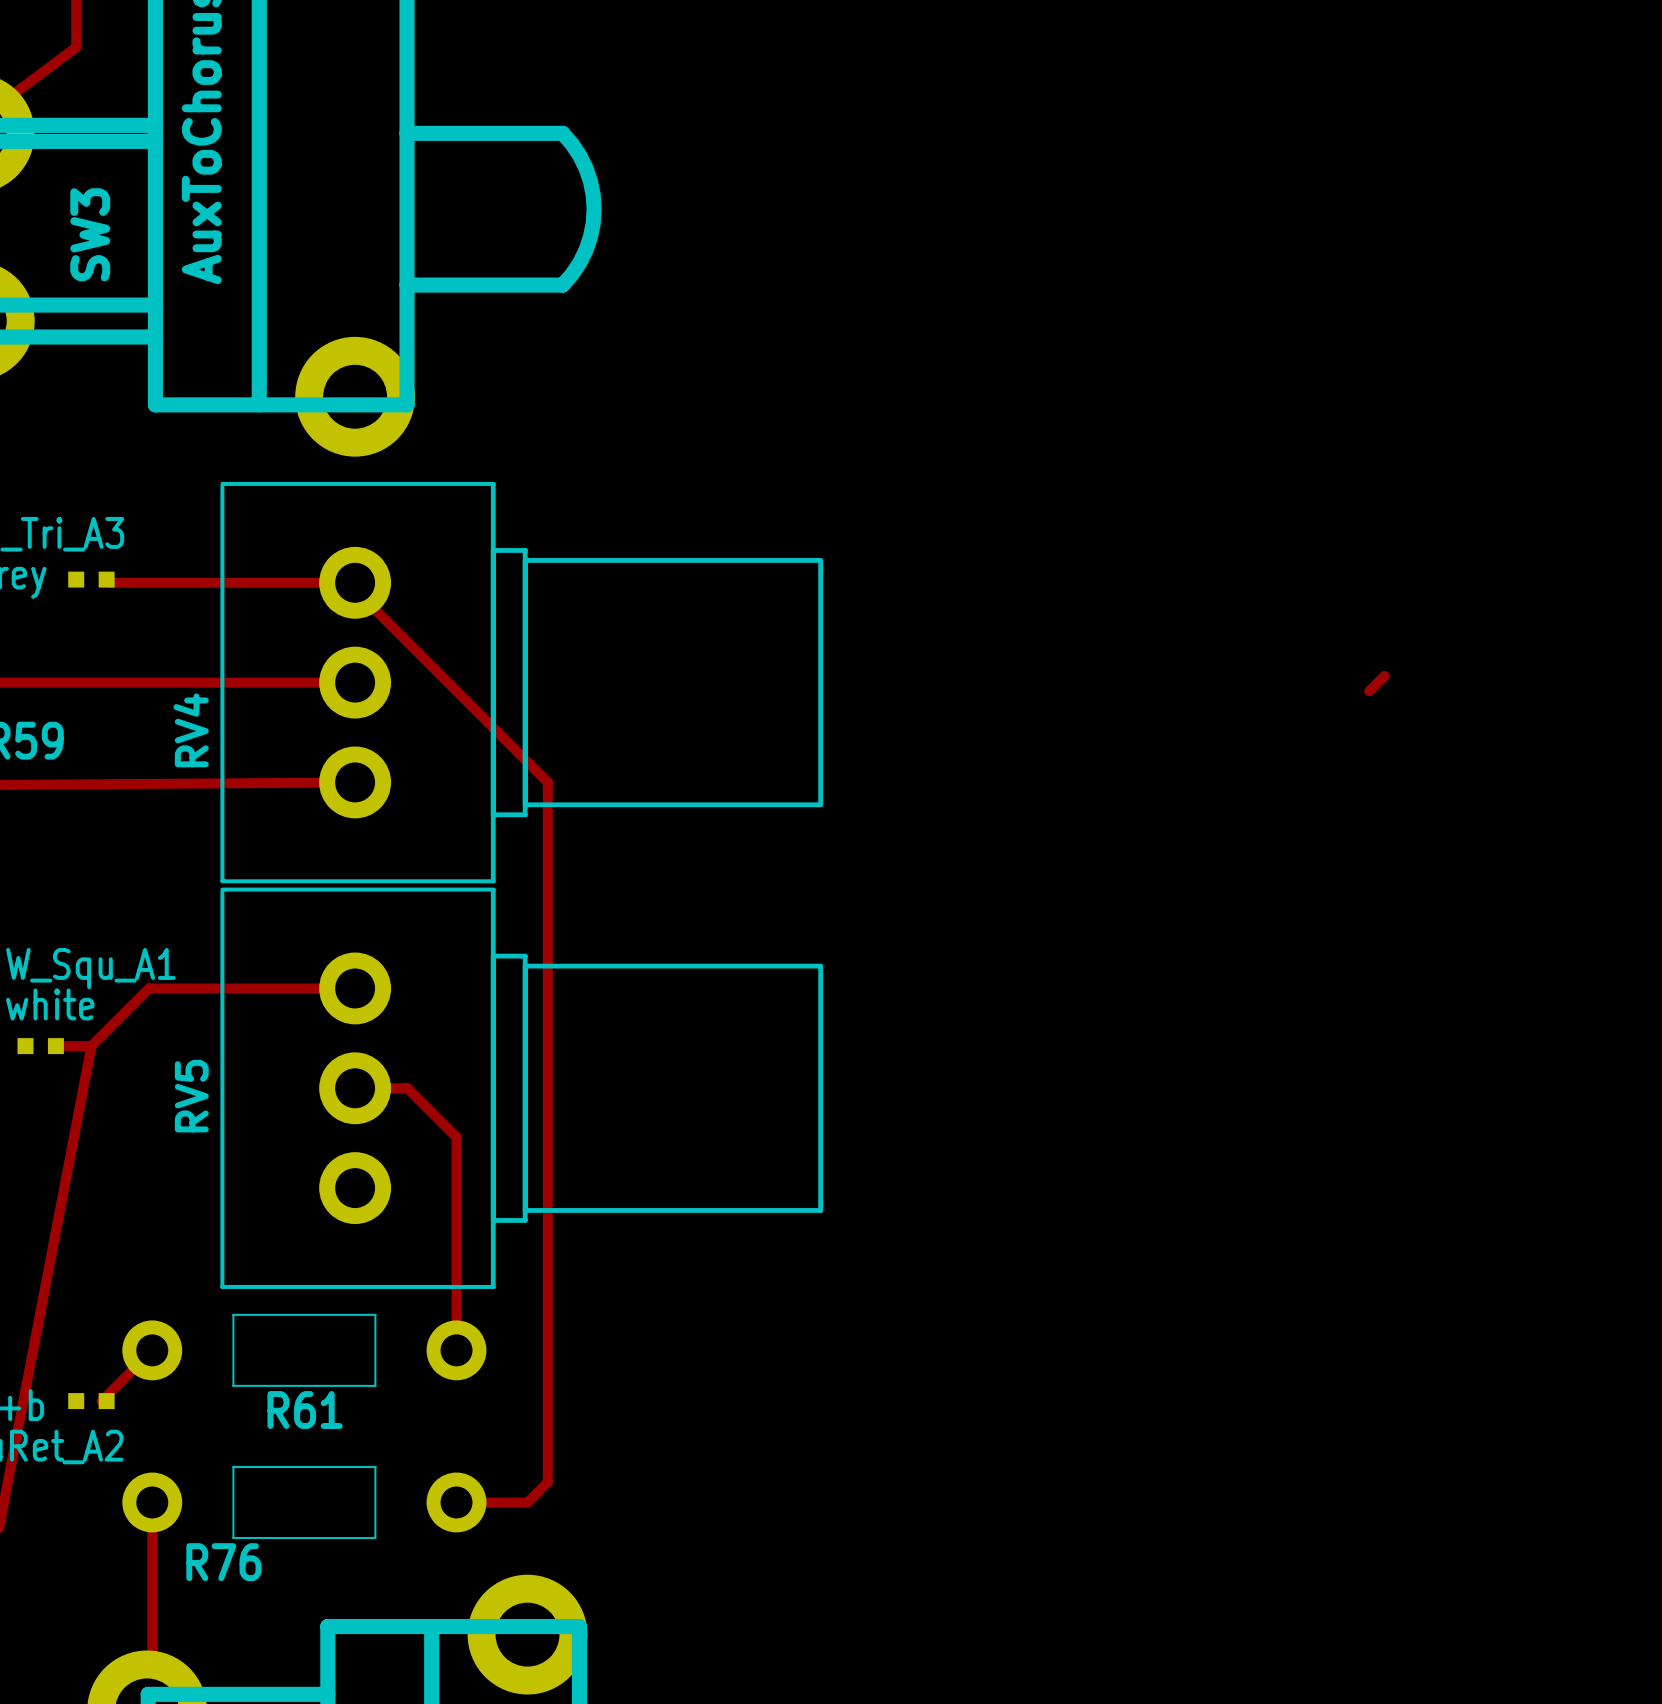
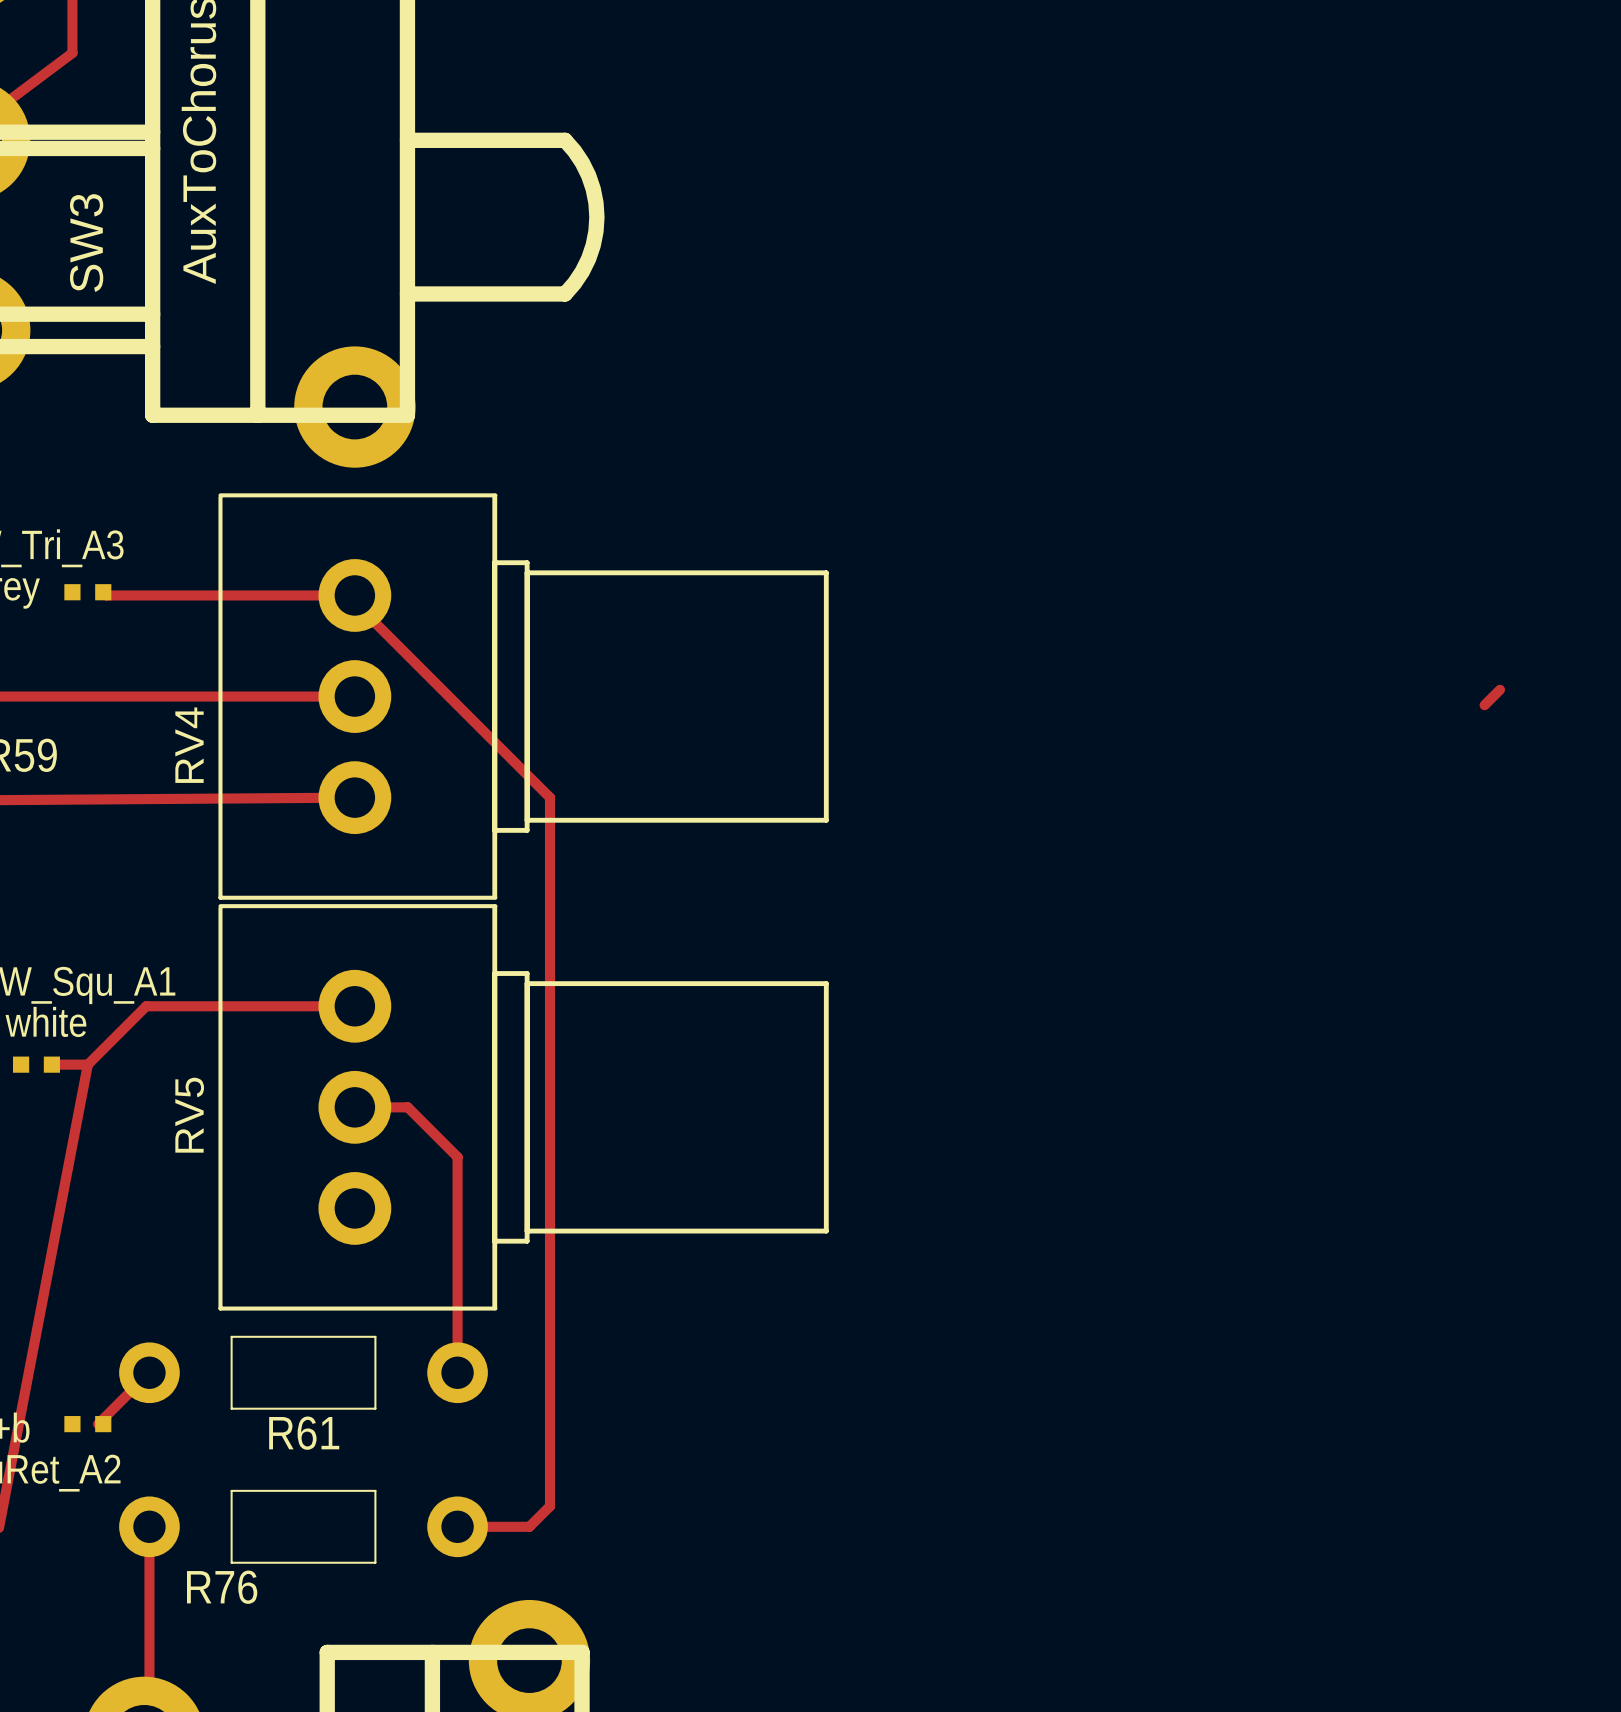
track: (1384, 675) (1369, 691) -> (1499, 689) (1484, 705)

